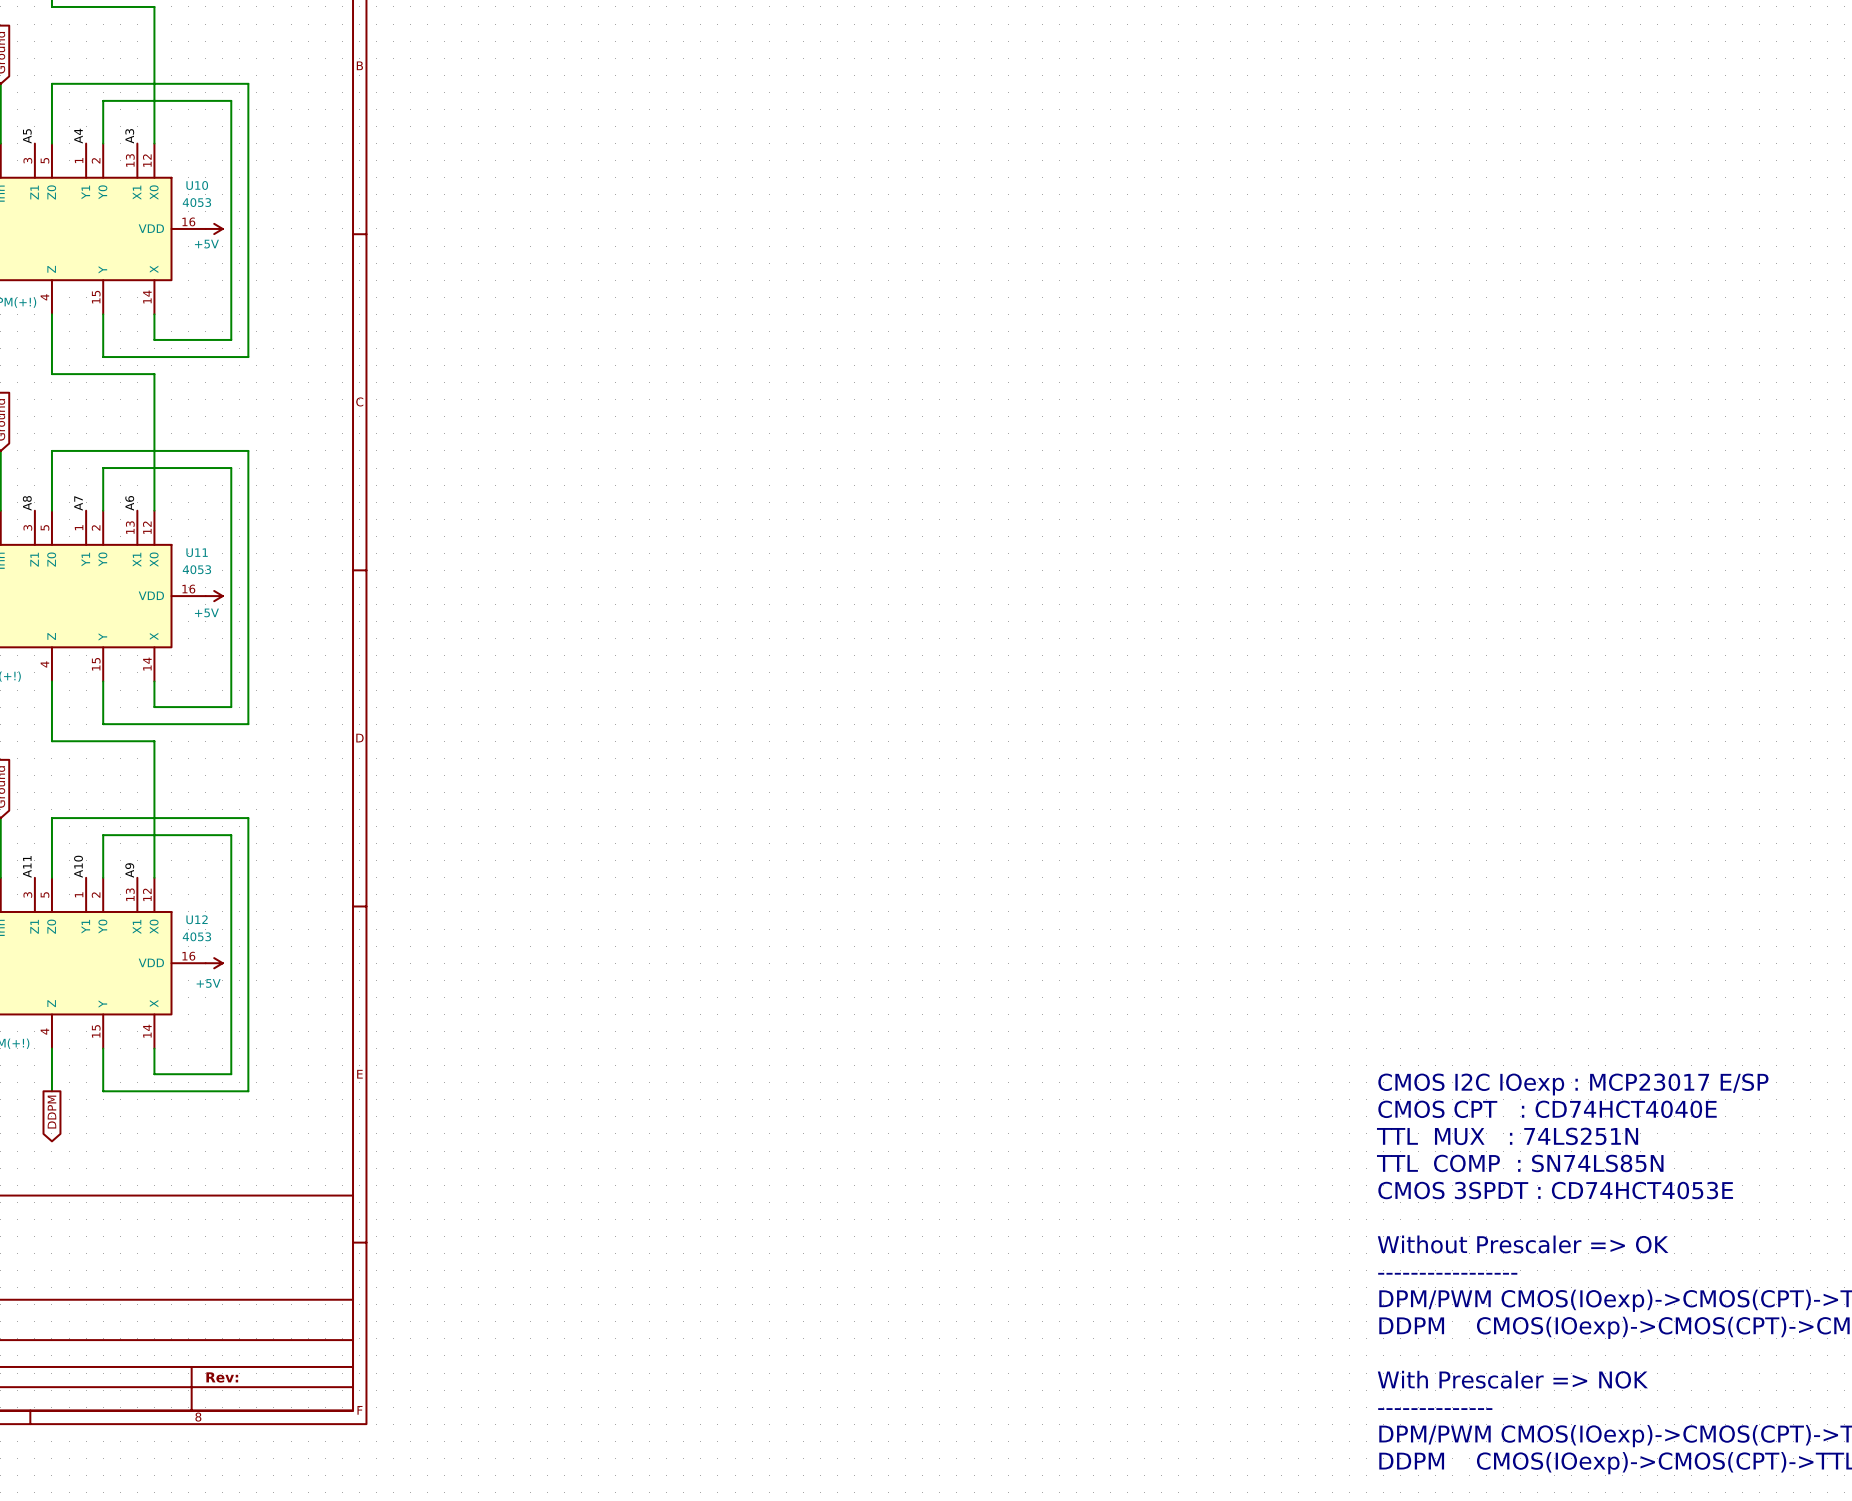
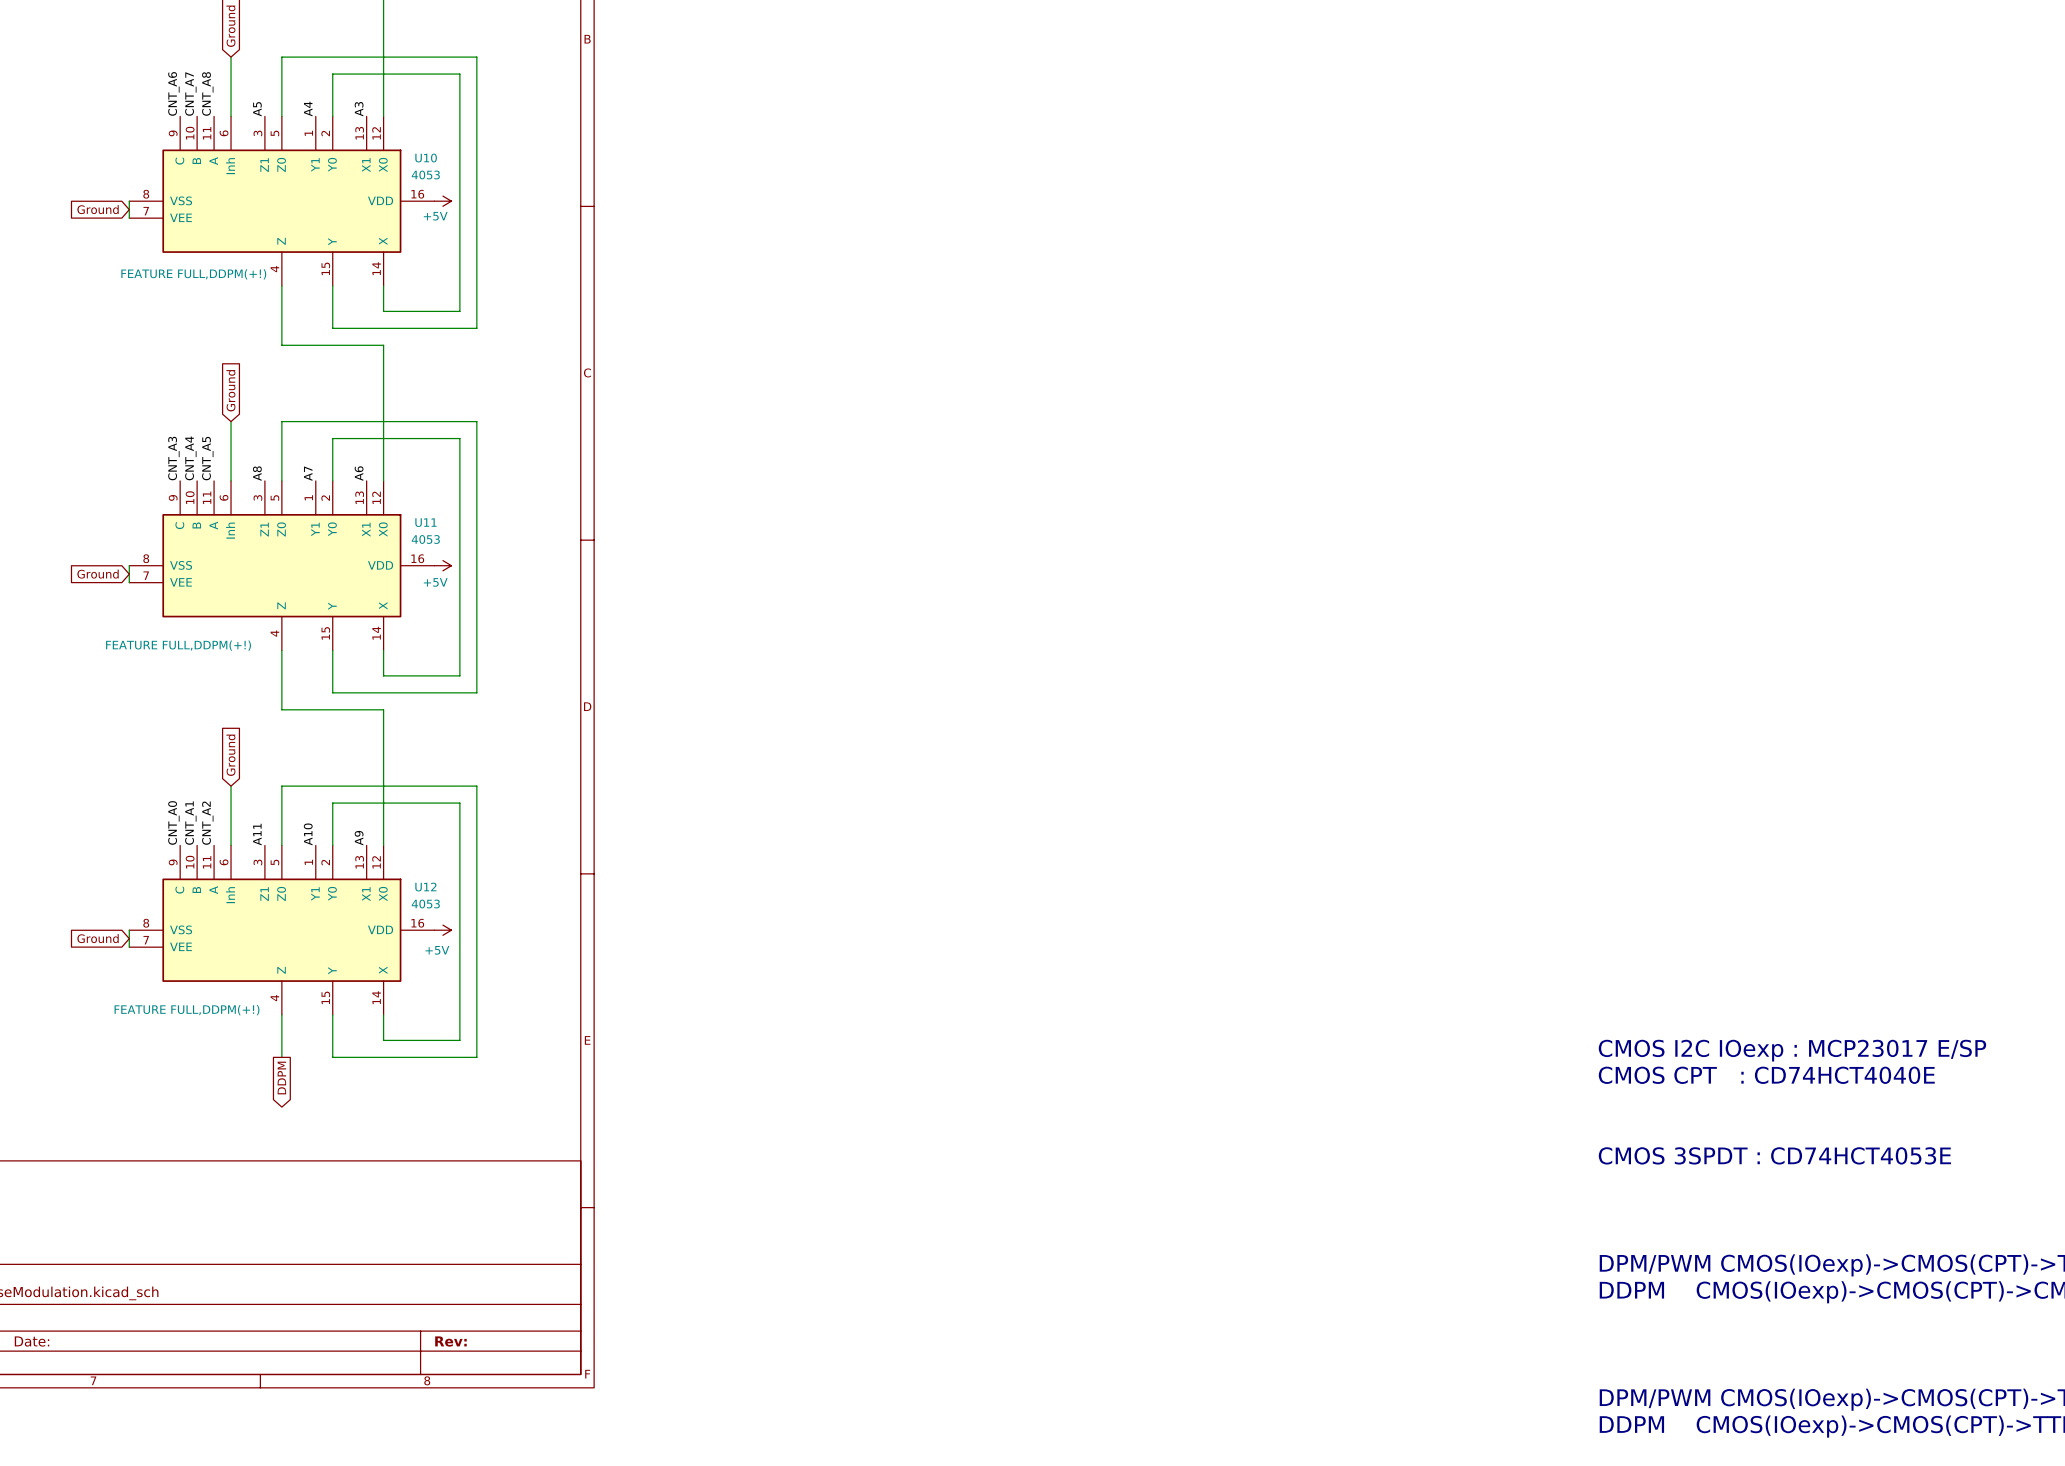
text: TTL MUX : 74LS251N (1507, 1136) -> none
text: TTL COMP : SN74LS85N (1520, 1163) -> none
text: Without Prescaler => OK (1523, 1244) -> none
text: ----------------- (1447, 1273) -> none
text: With Prescaler => NOK (1512, 1379) -> none
text: -------------- (1435, 1409) -> none

